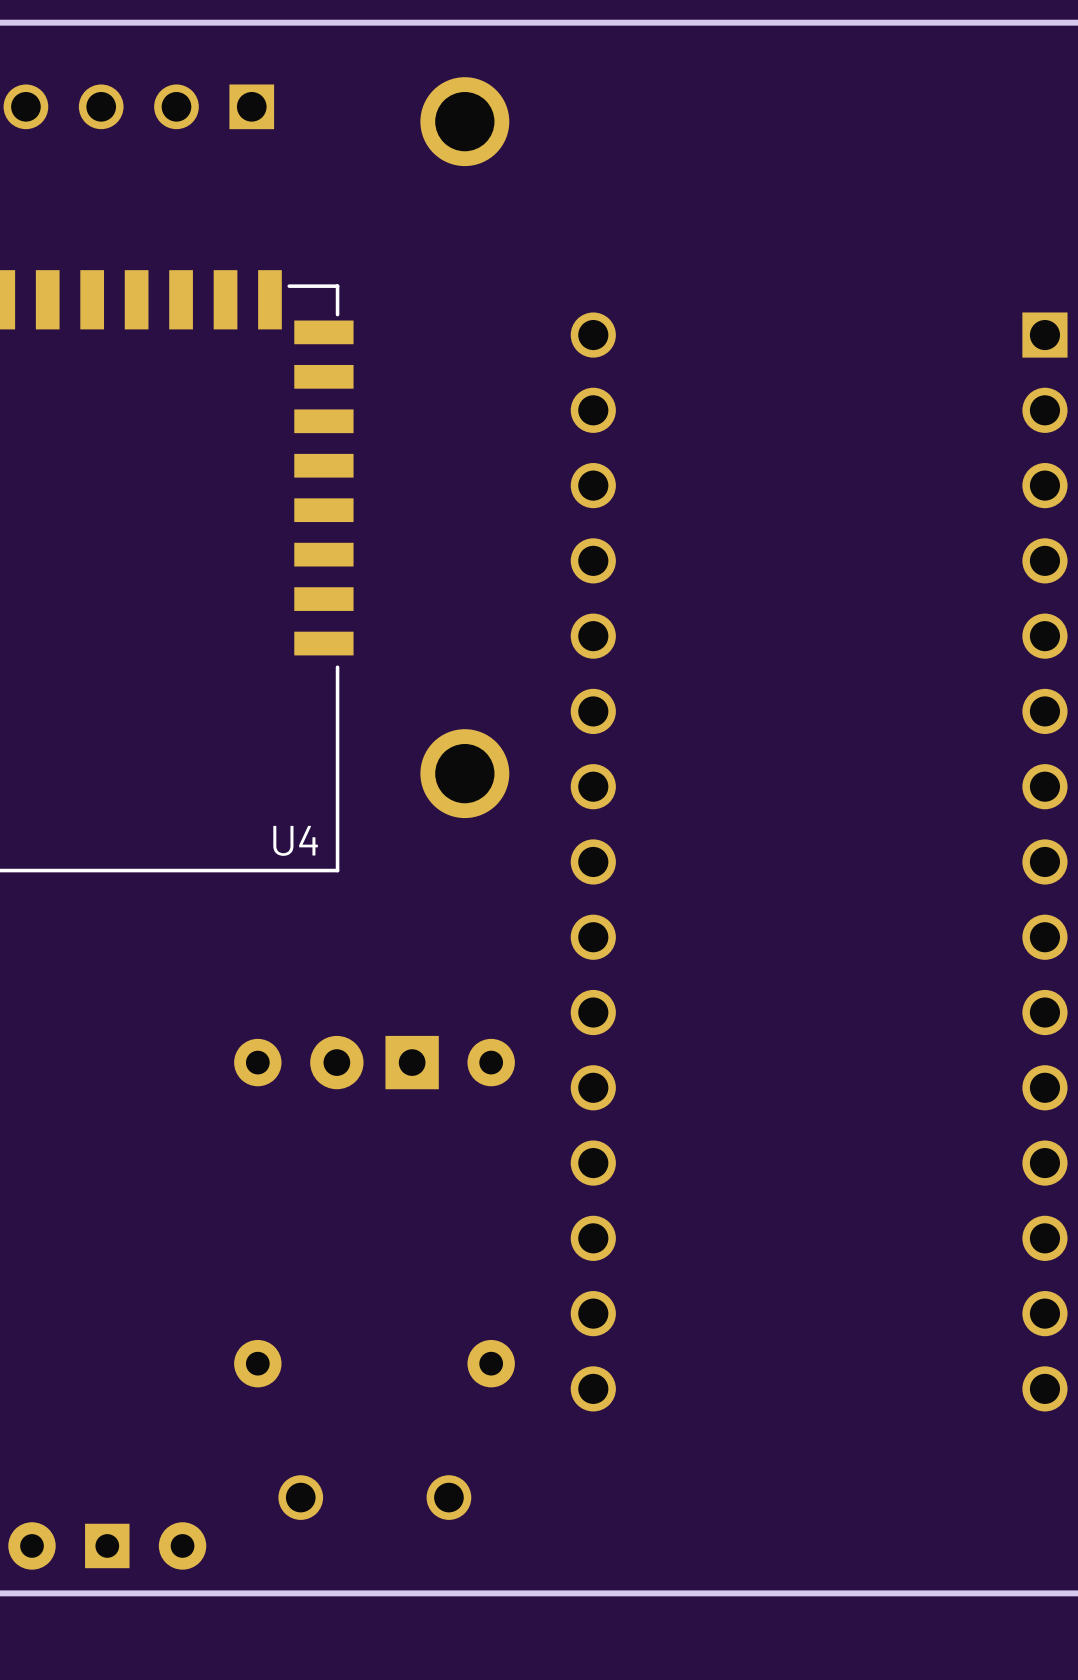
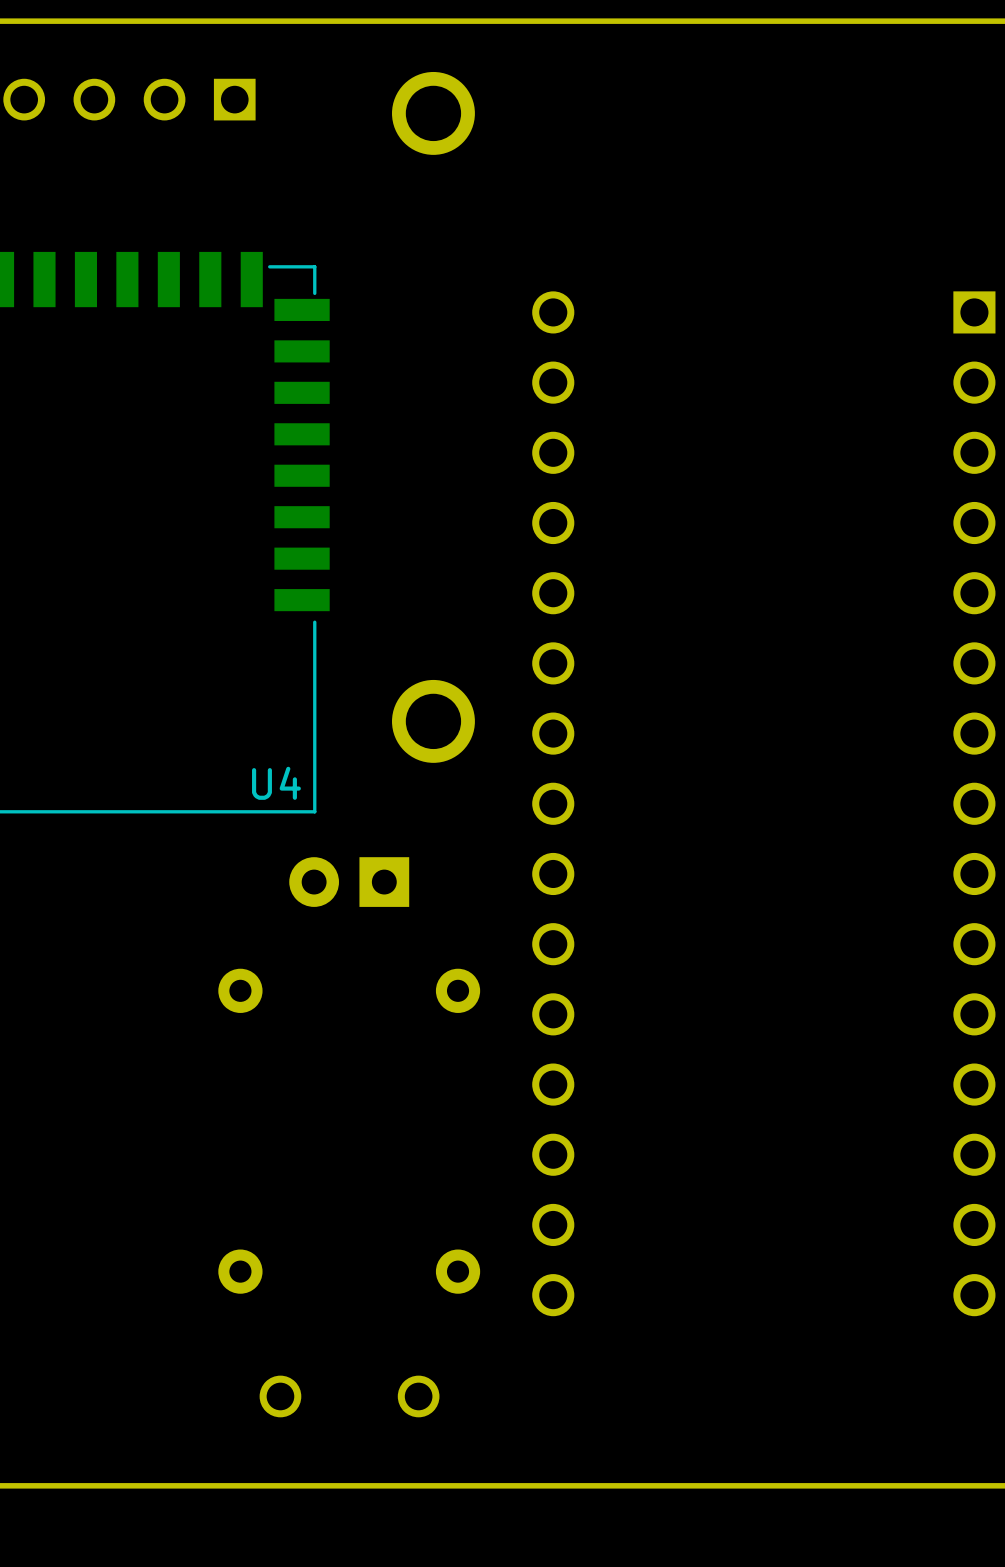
part position: (374, 1062) -> (349, 882)
part: (107, 1545) -> none

